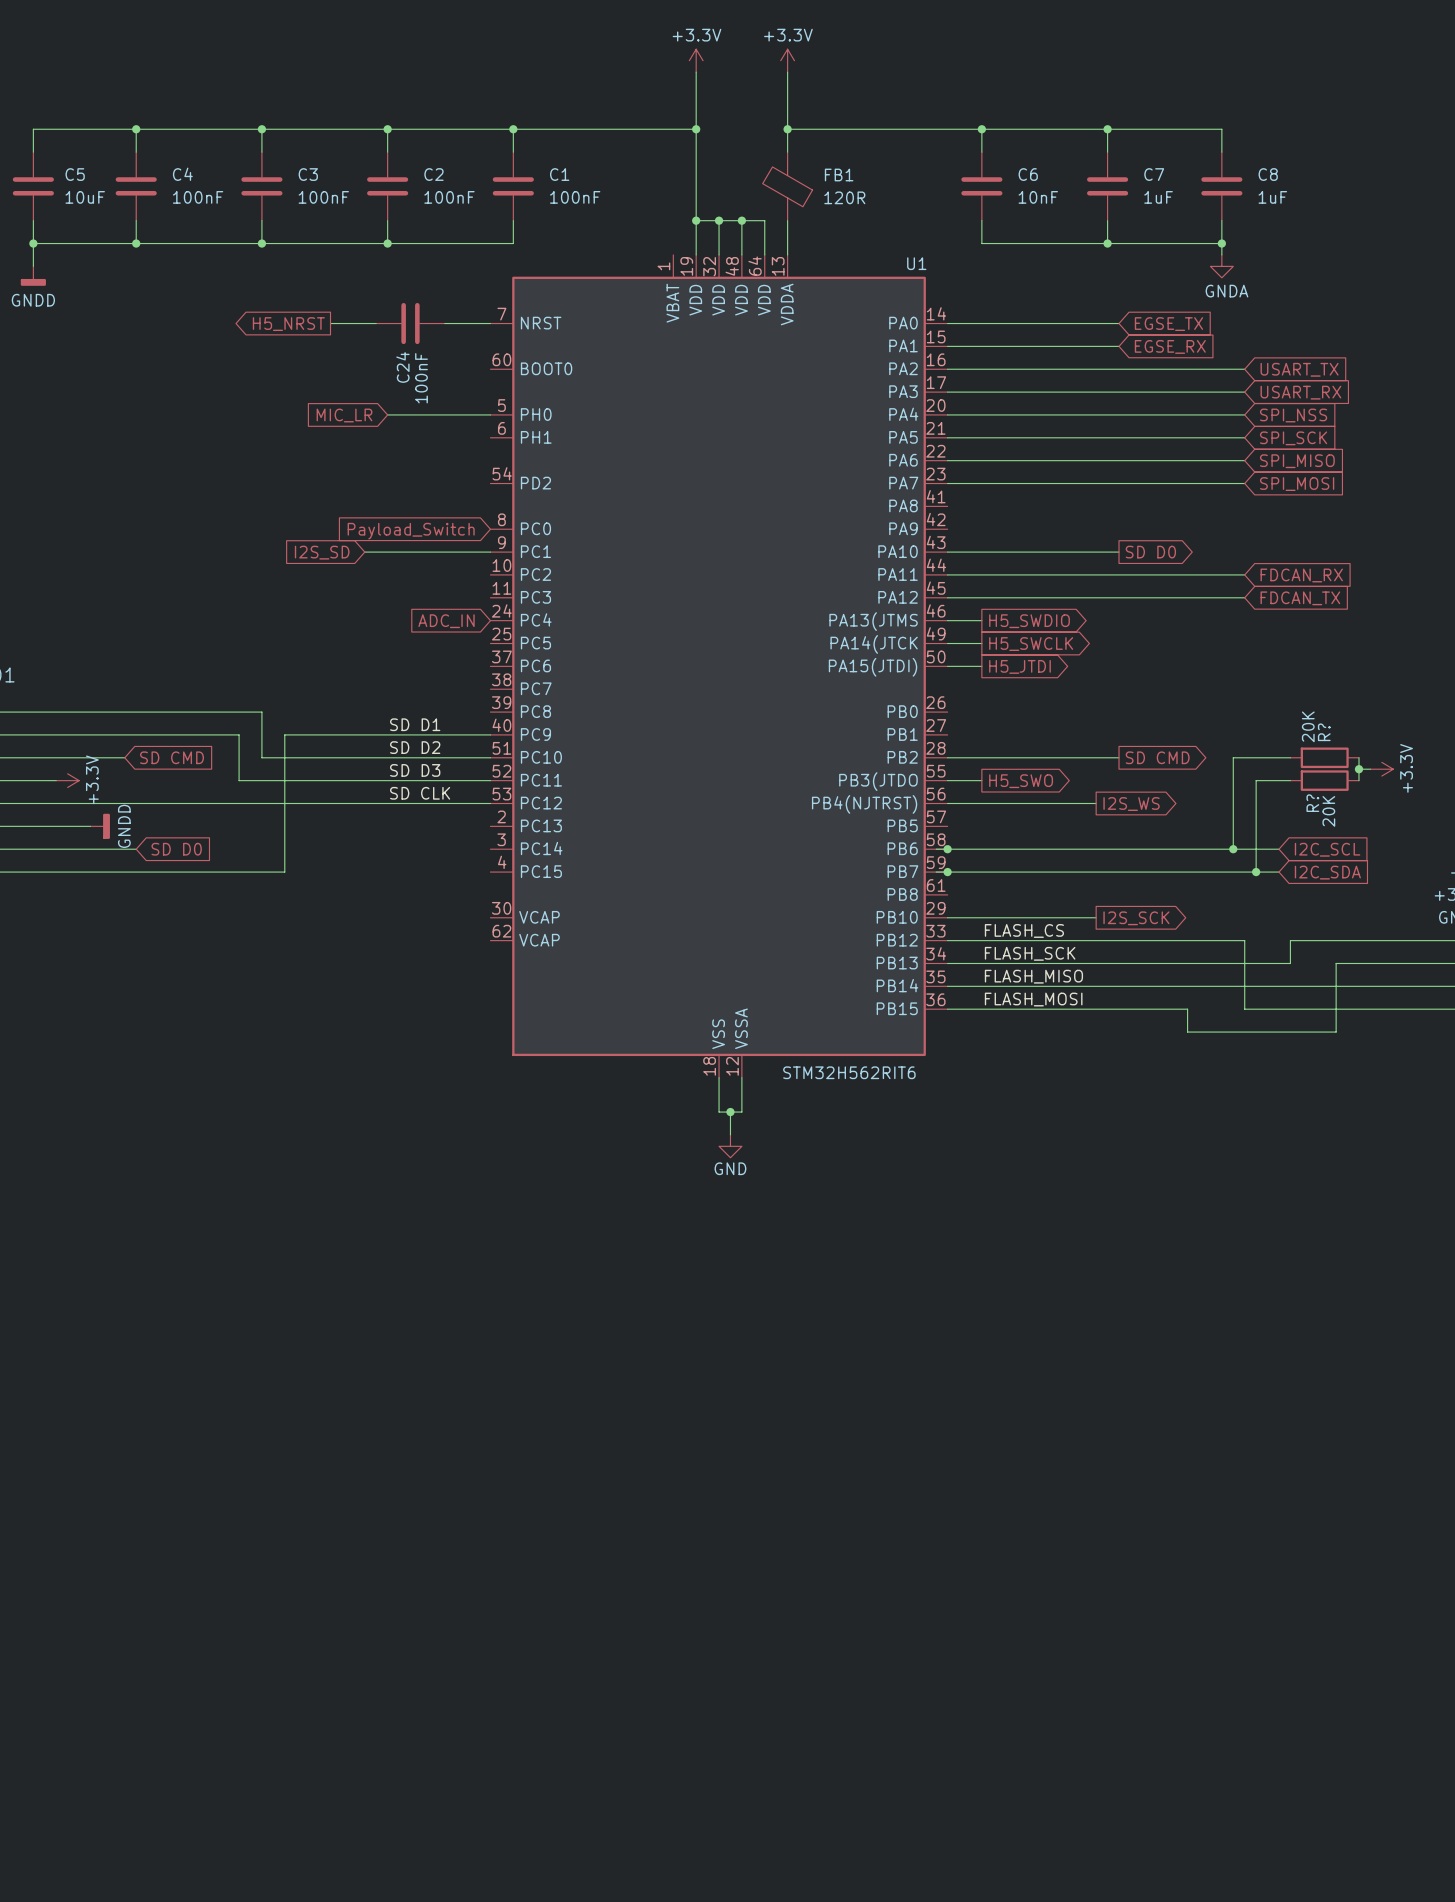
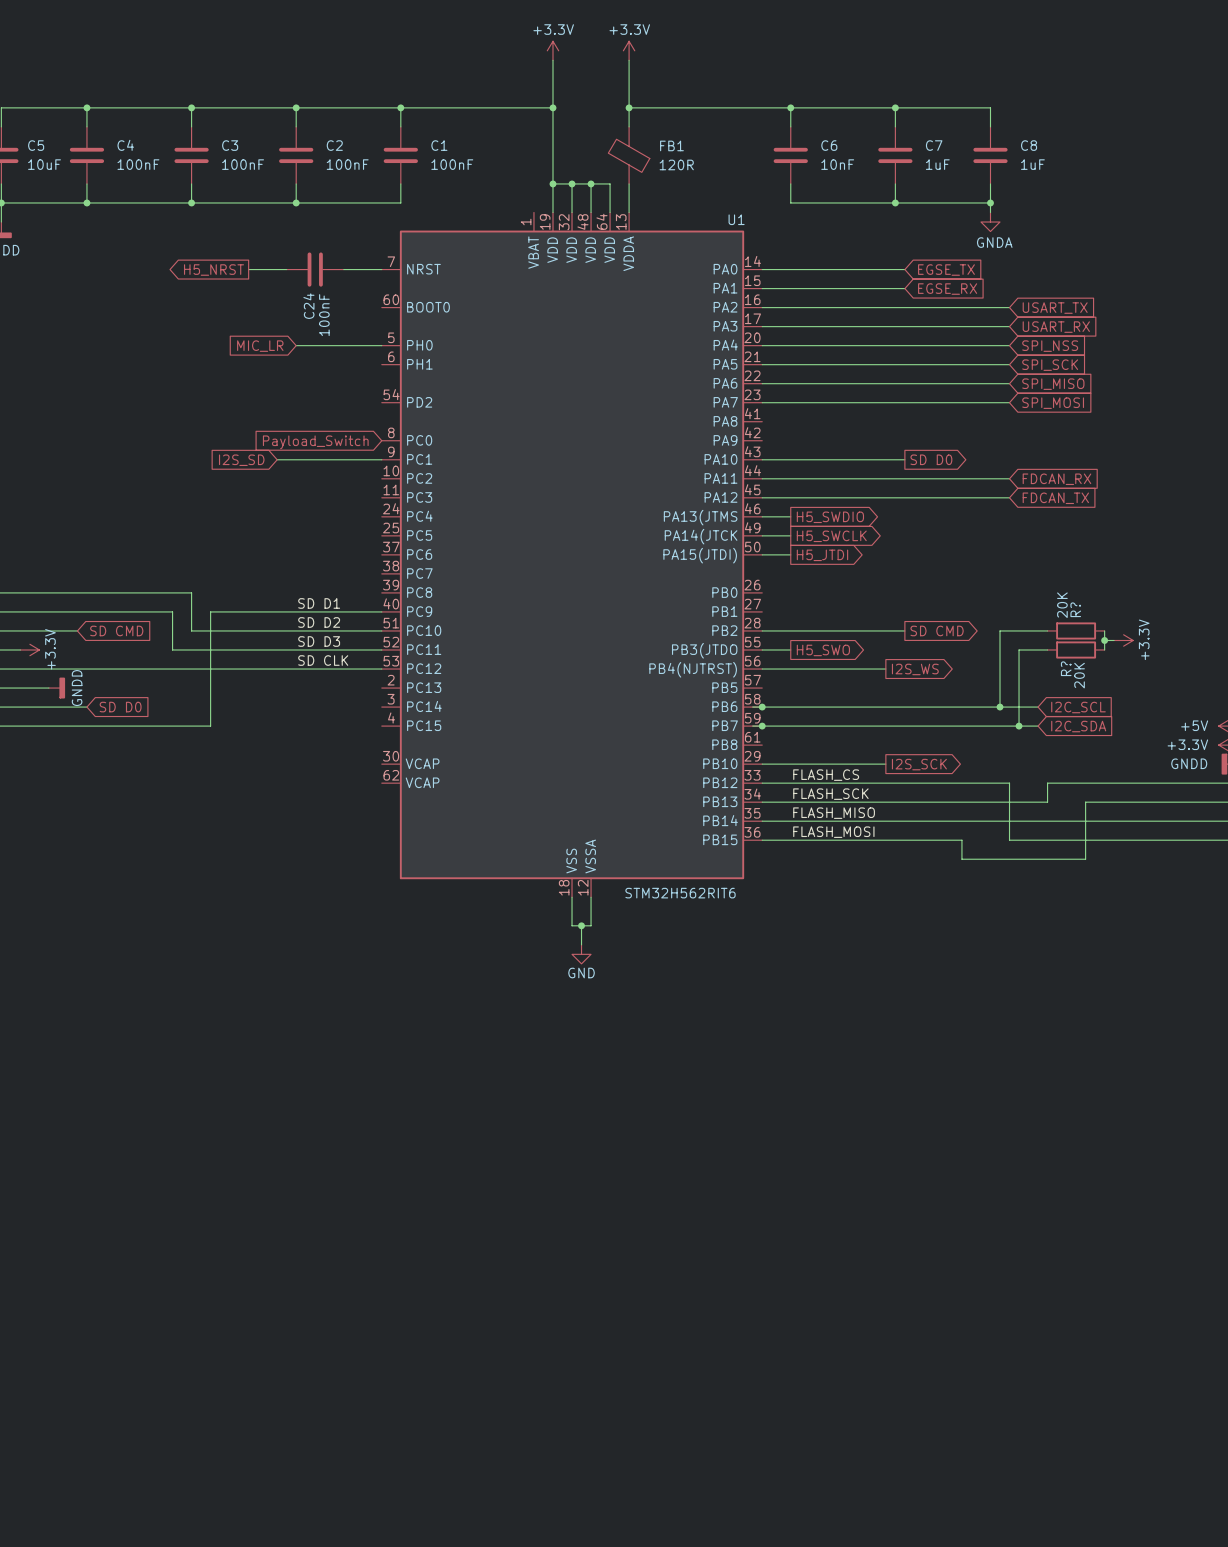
global label: ADC_IN (446, 621) -> none

